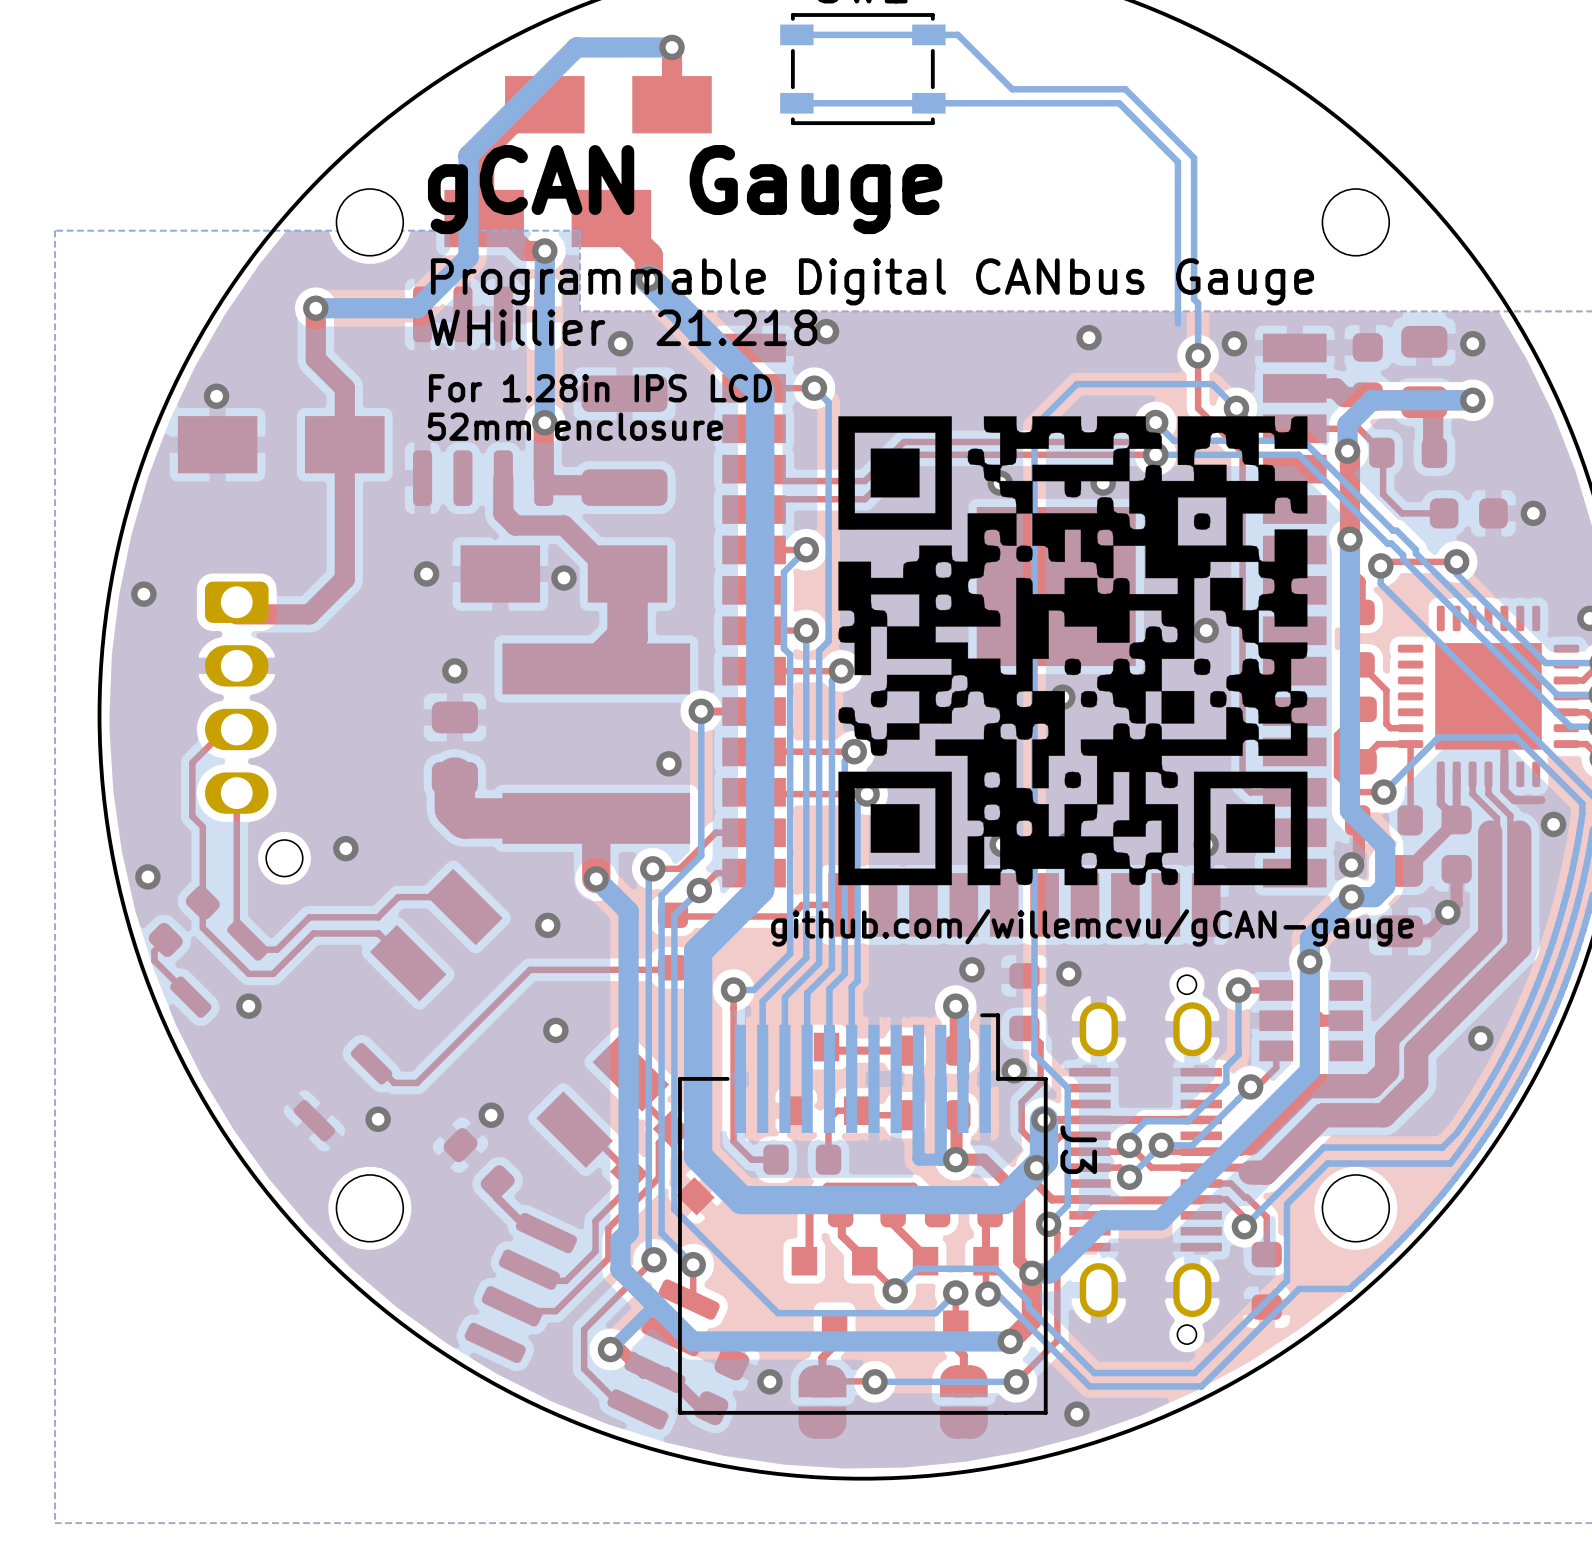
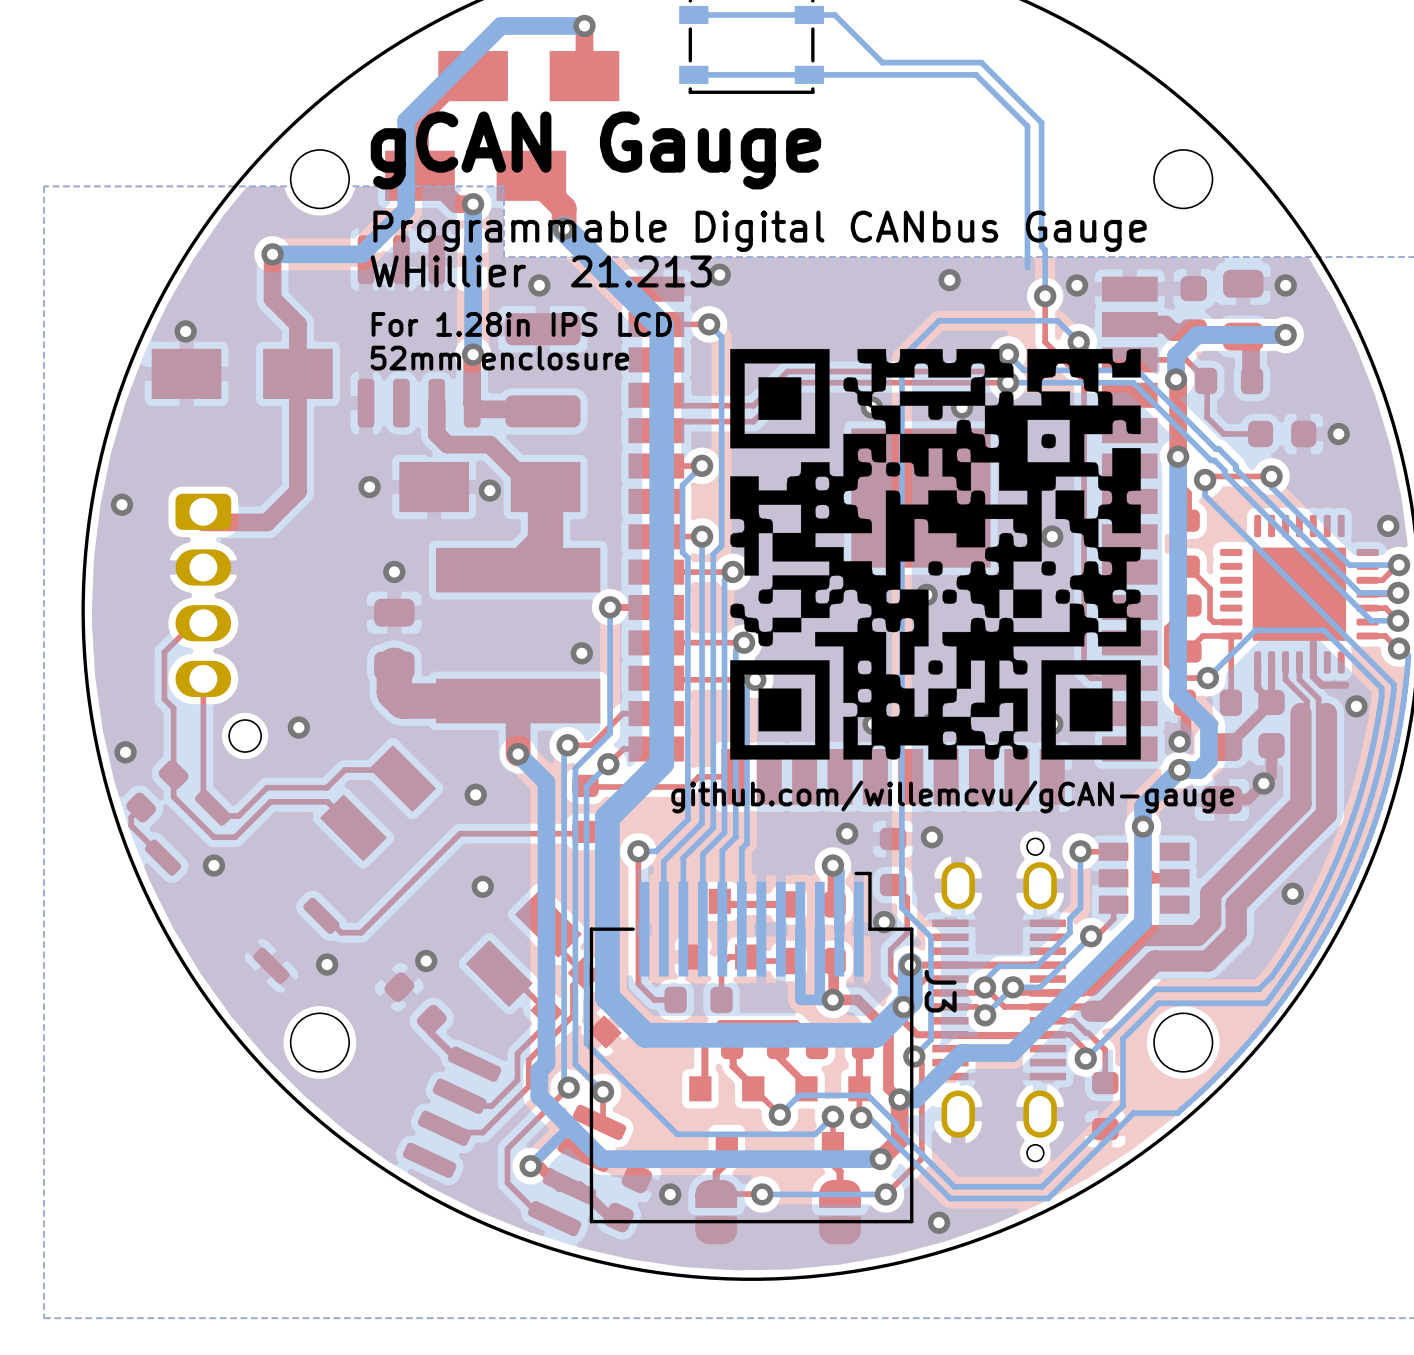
text: WHillier 21.218 (622, 327) -> WHillier 21.213 (541, 271)

